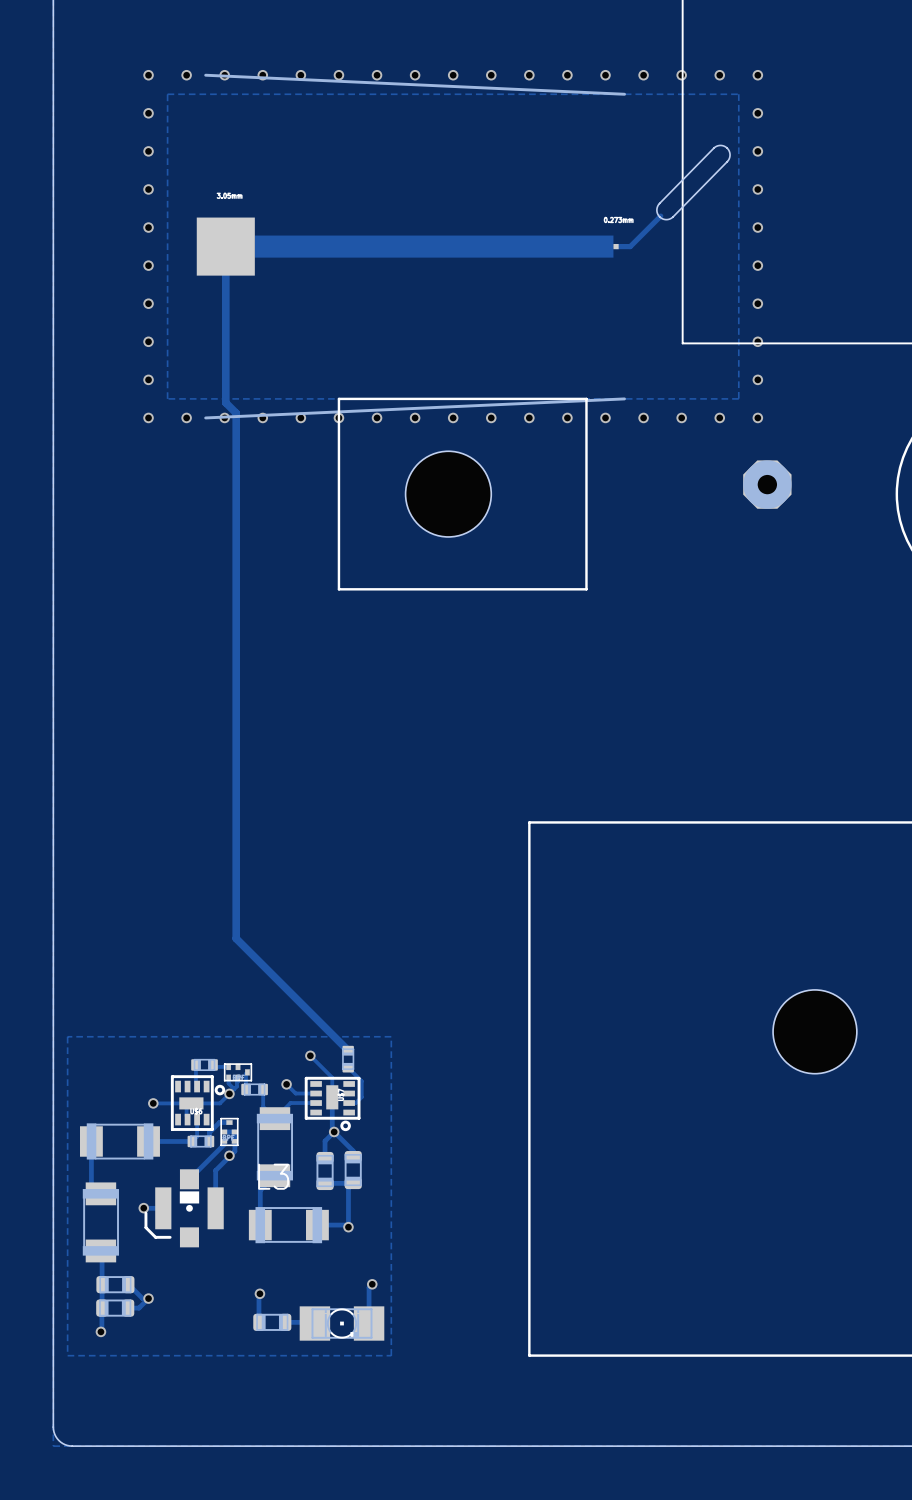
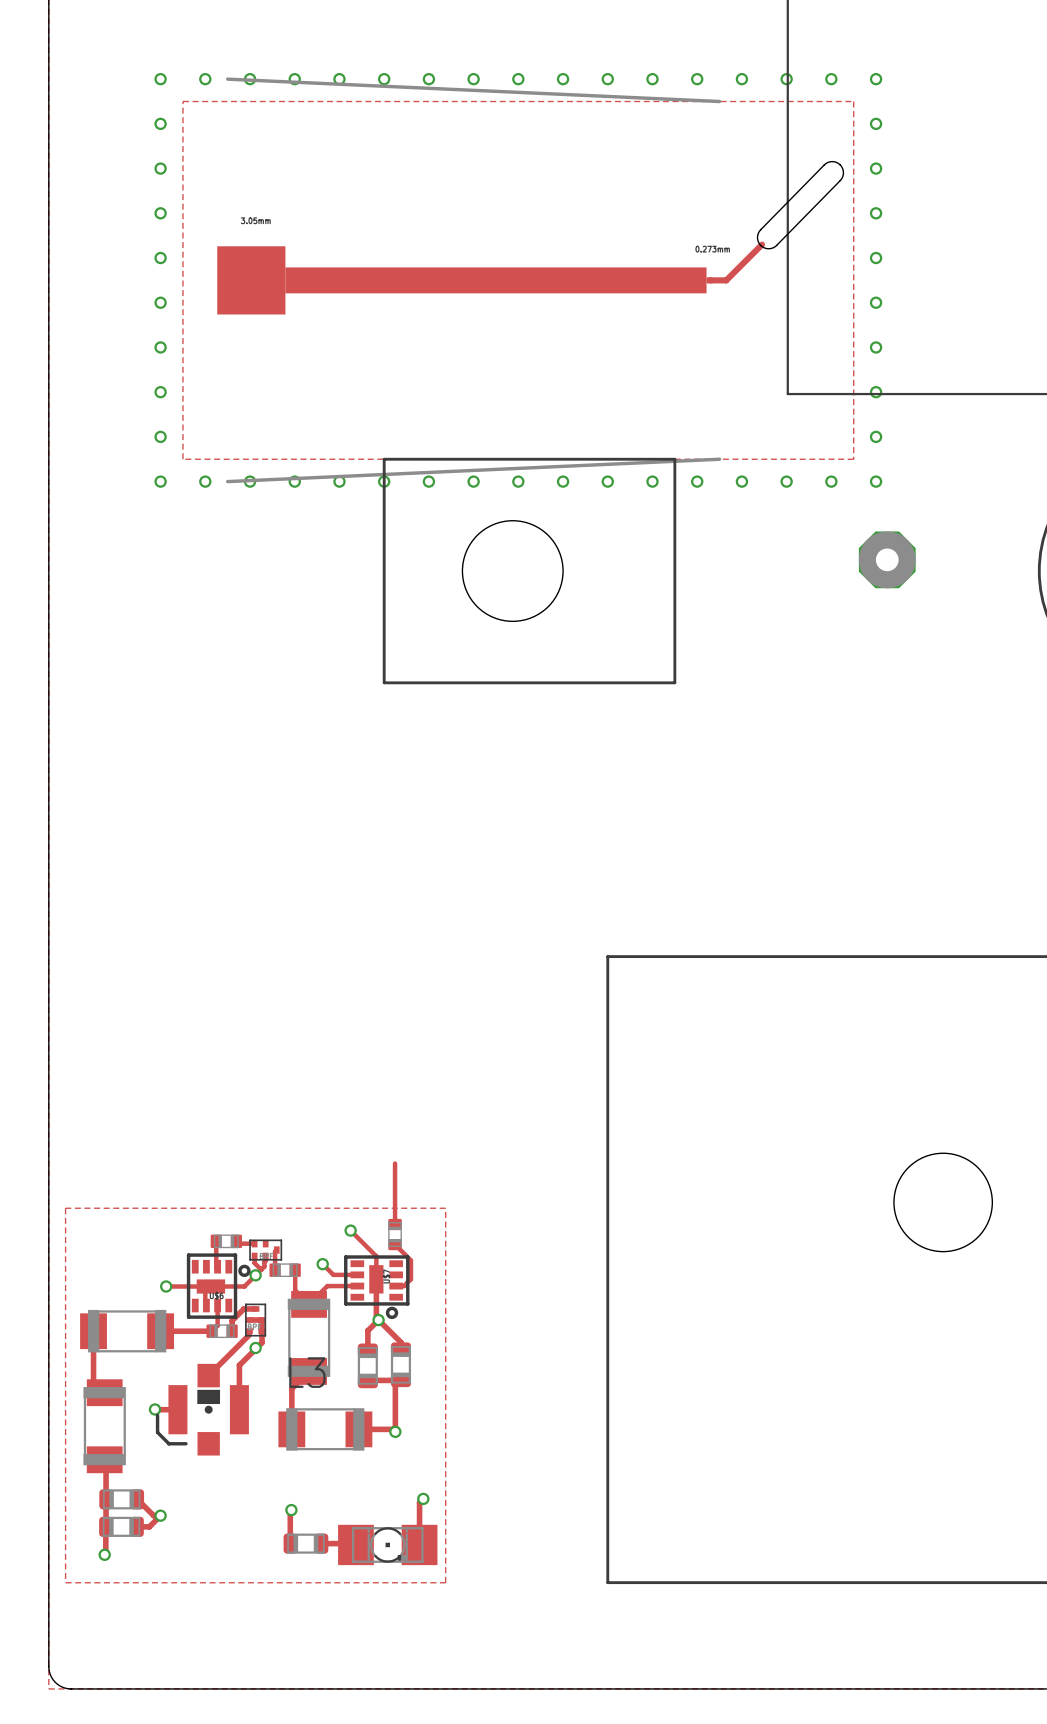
track: (225, 246) (225, 402) (236, 413) (236, 938) (348, 1050) -> (395, 1163) (395, 1224)

